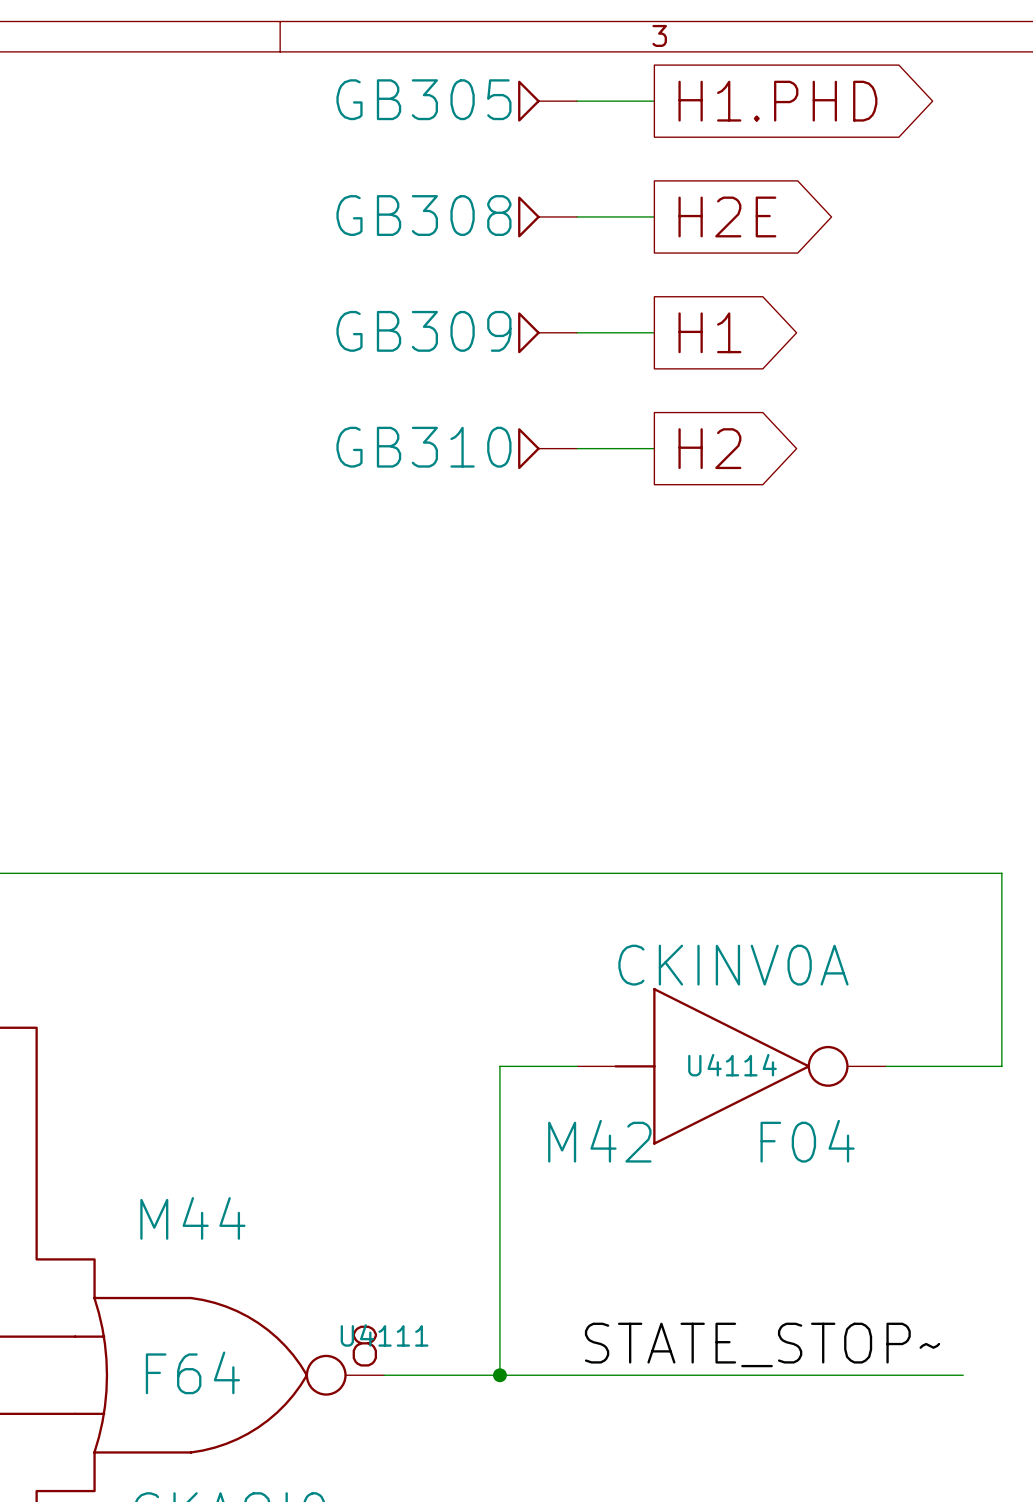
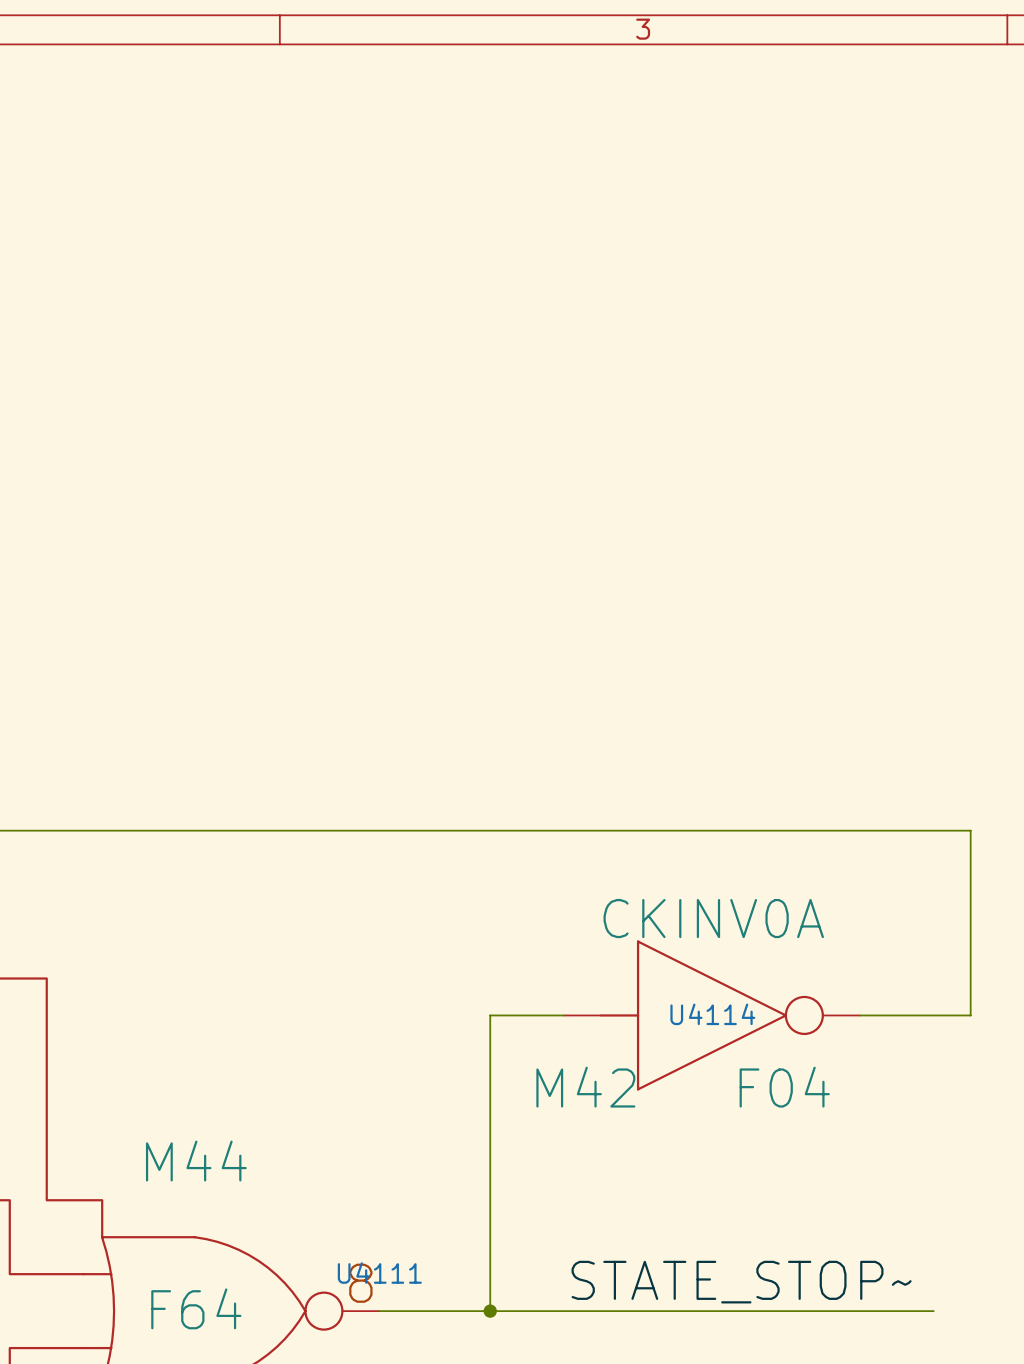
GB305: (547, 101) -> none
wire: (577, 101) (654, 101) -> none
global label: H1.PHD (777, 101) -> none
GB308: (547, 216) -> none
wire: (577, 216) (654, 216) -> none
global label: H2E (727, 216) -> none
GB309: (547, 332) -> none
wire: (577, 332) (654, 332) -> none
global label: H1 (709, 332) -> none
GB310: (547, 448) -> none
wire: (577, 448) (654, 448) -> none
global label: H2 (709, 448) -> none

